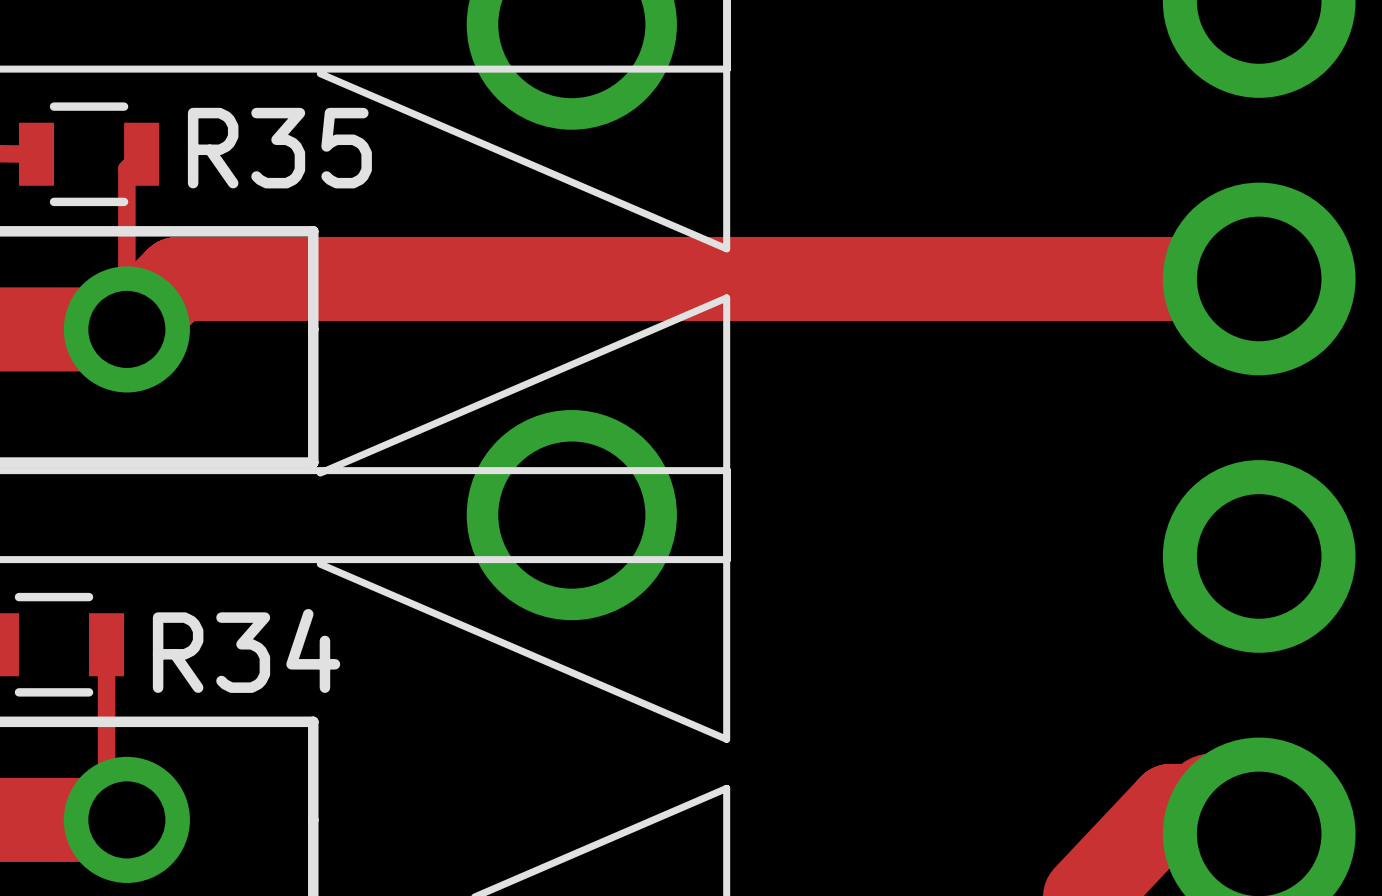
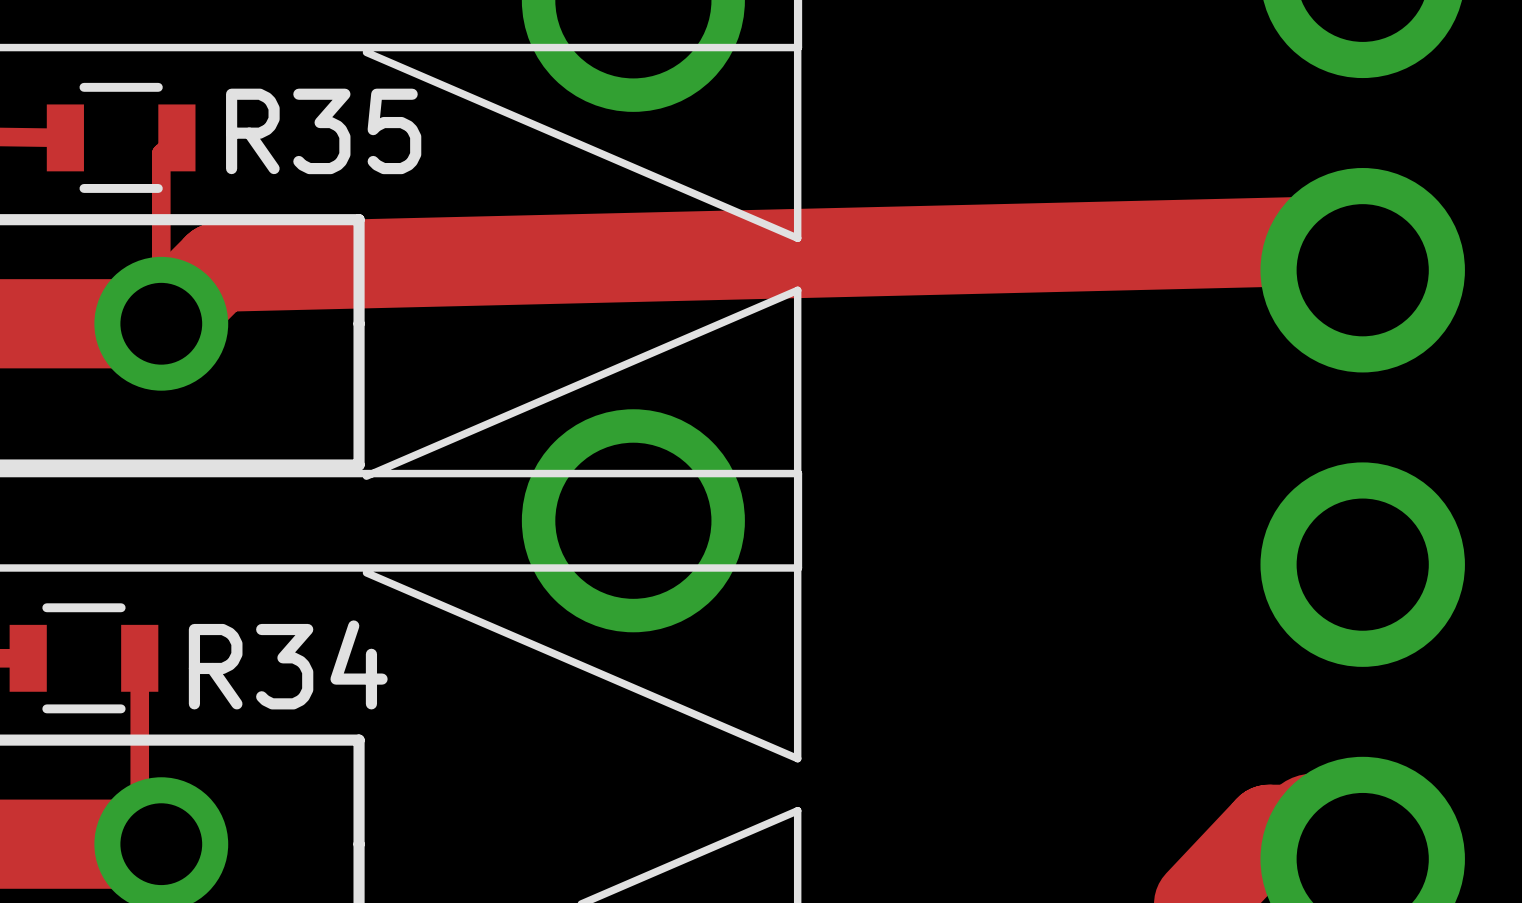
track: (177, 278) (1259, 278) -> (214, 270) (217, 267) (1347, 240)

